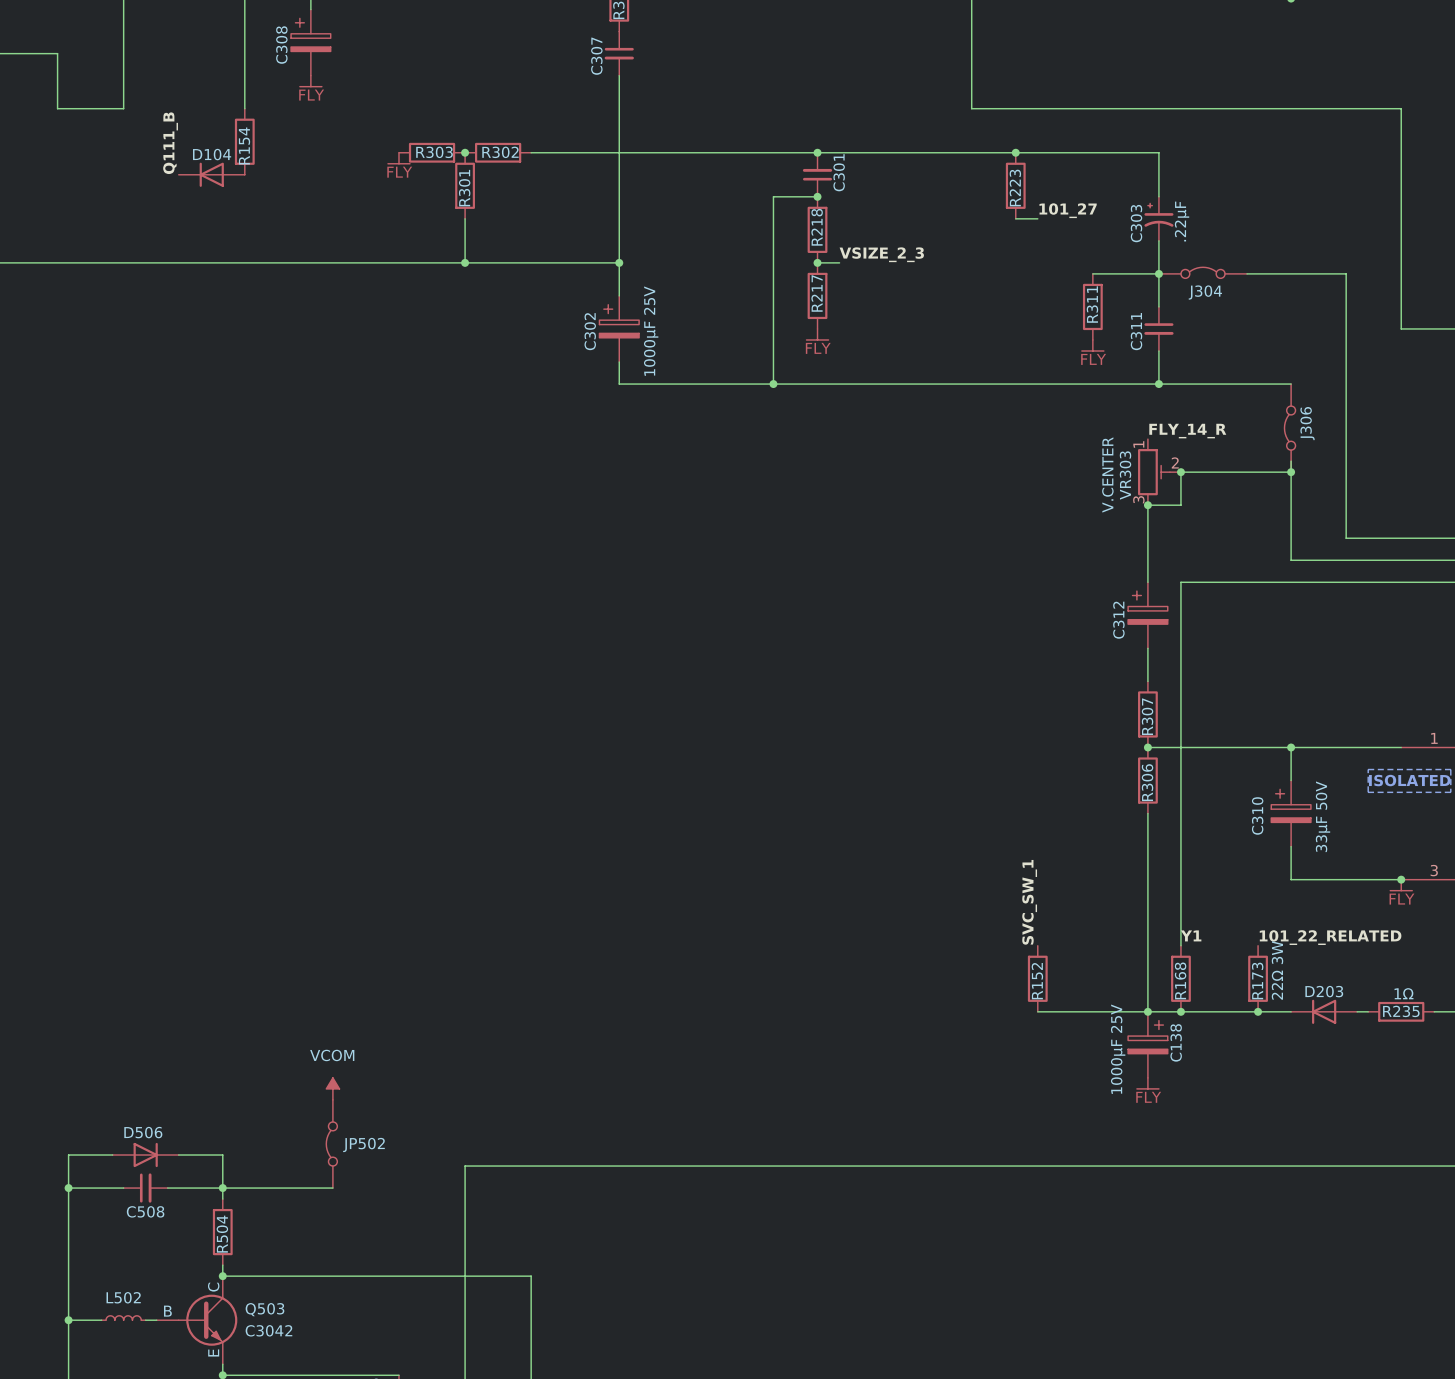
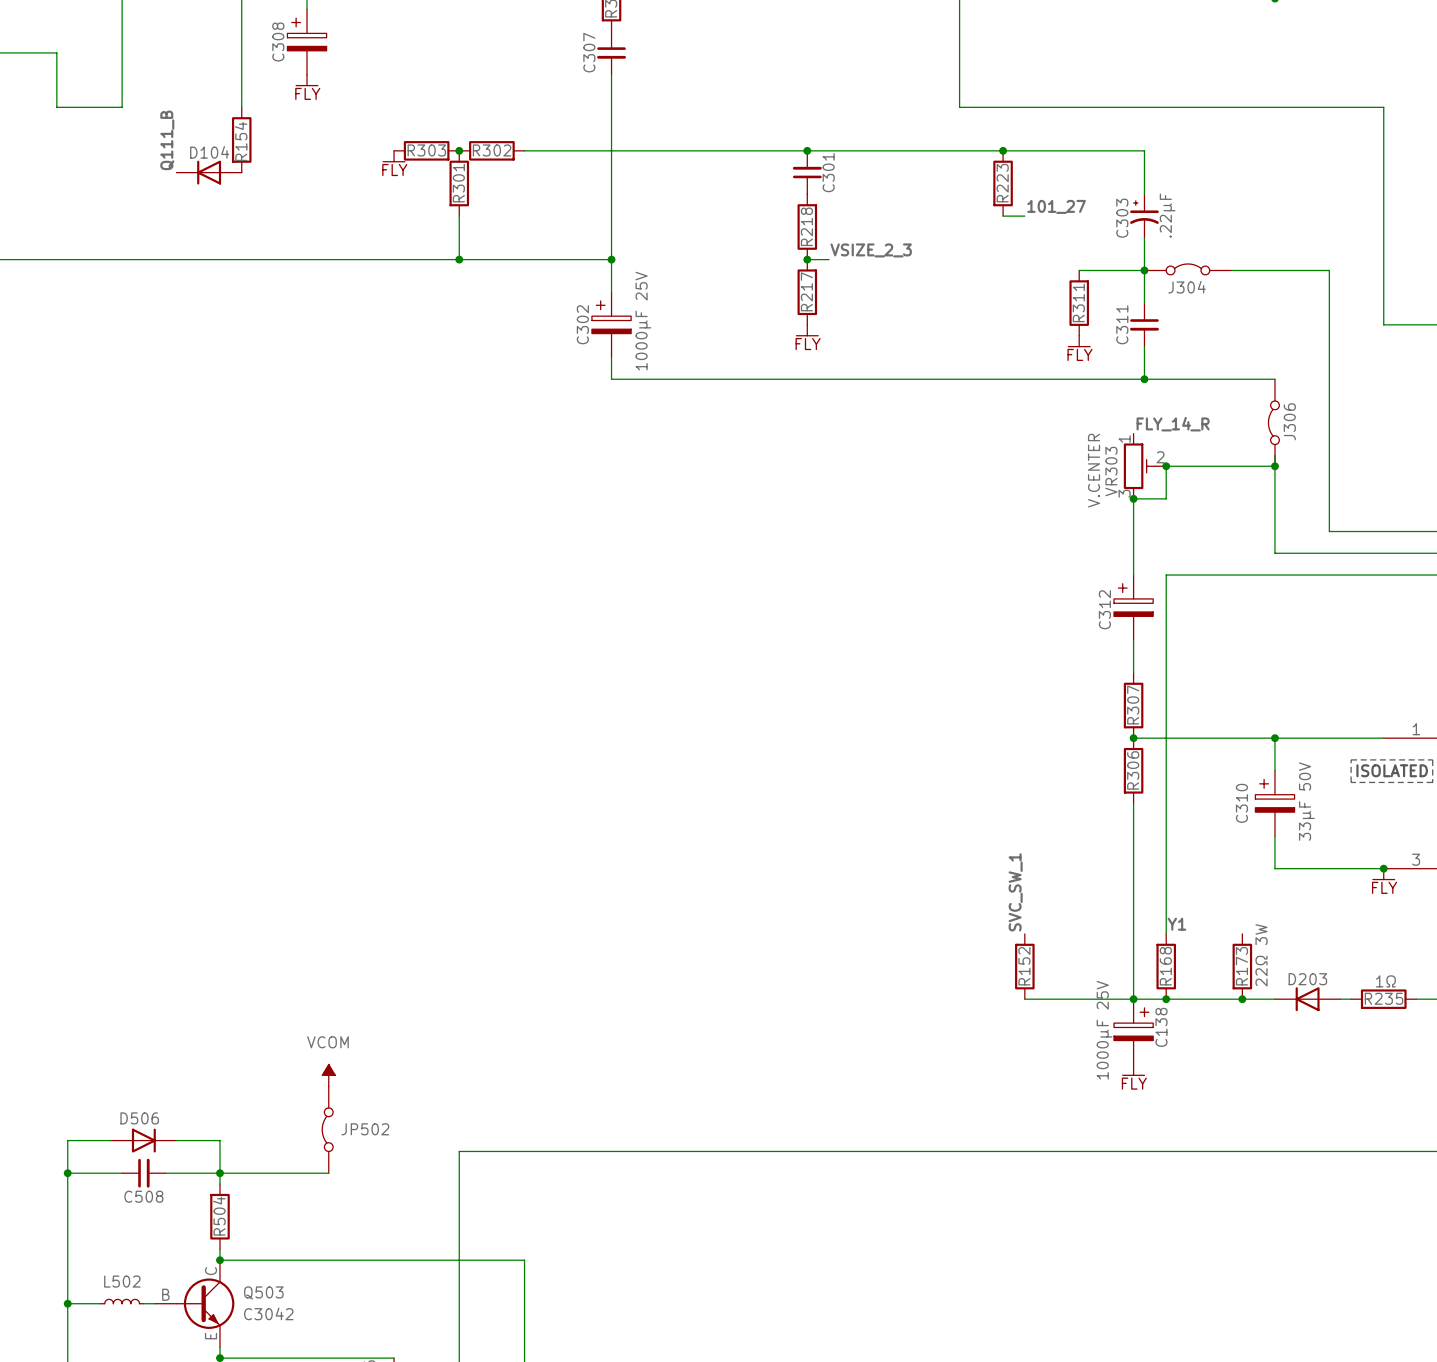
wire: (817, 196) (773, 196) (773, 384) -> none
junction: (817, 196) -> none
junction: (773, 384) -> none
label: 101_22_RELATED (1330, 937) -> none

